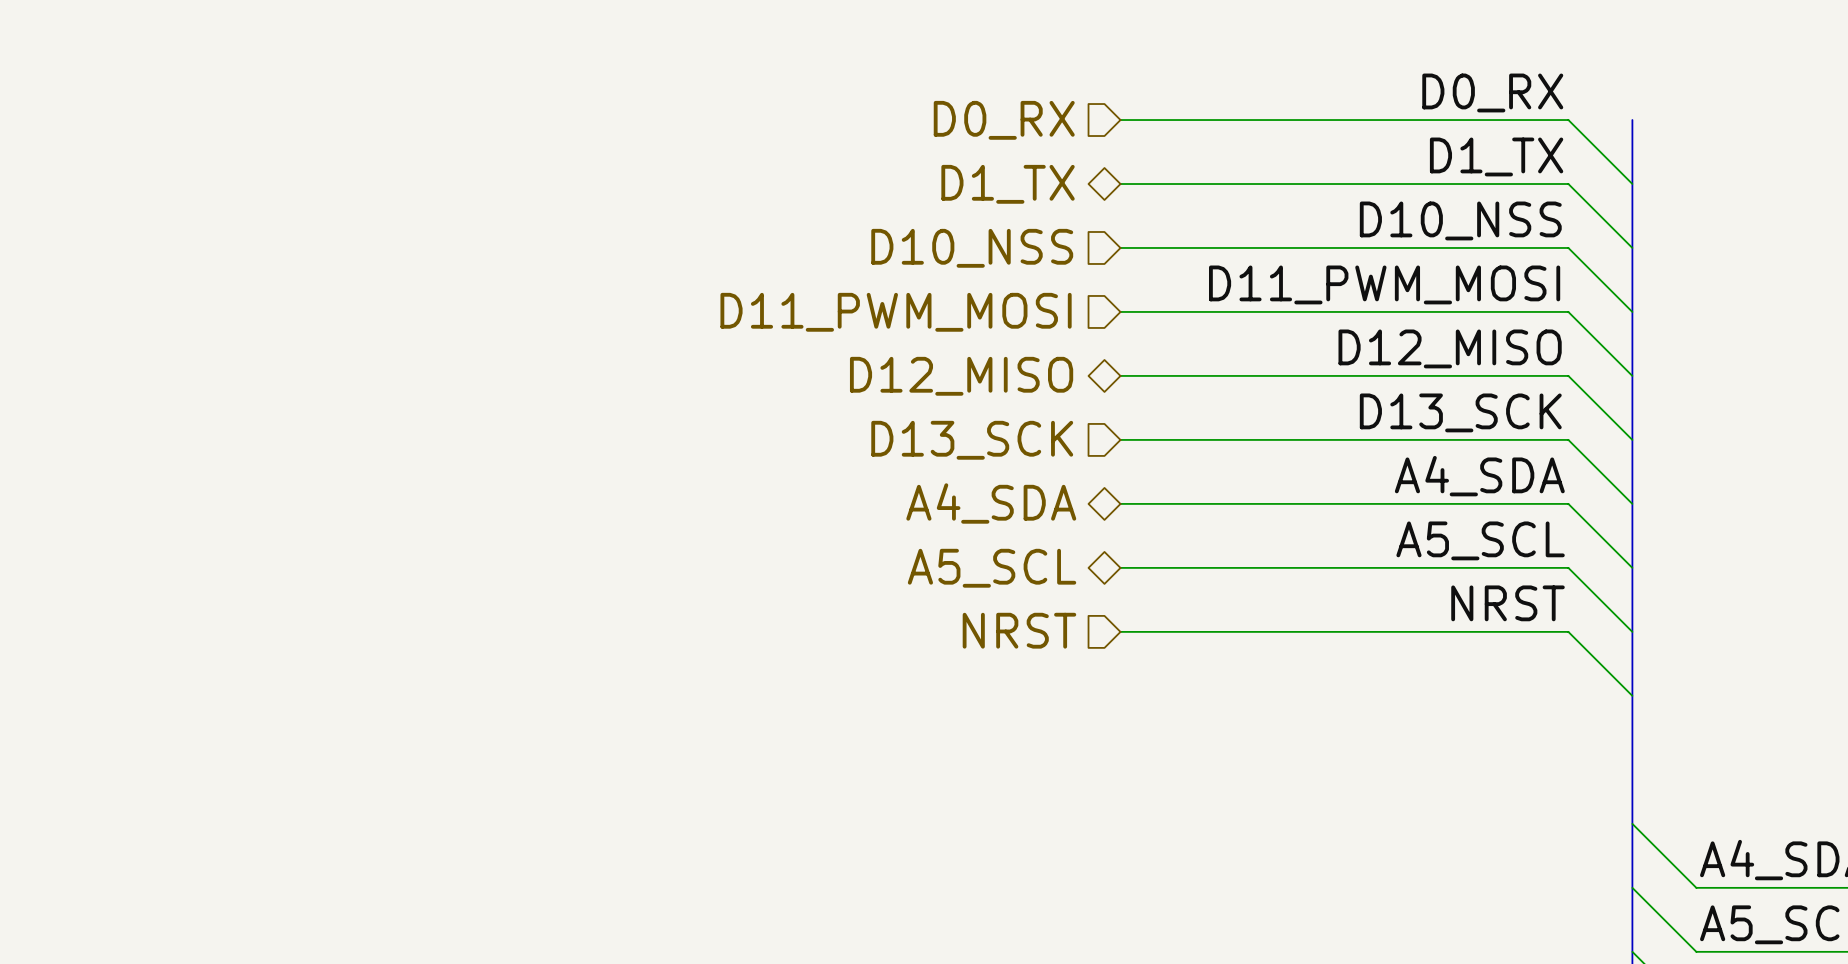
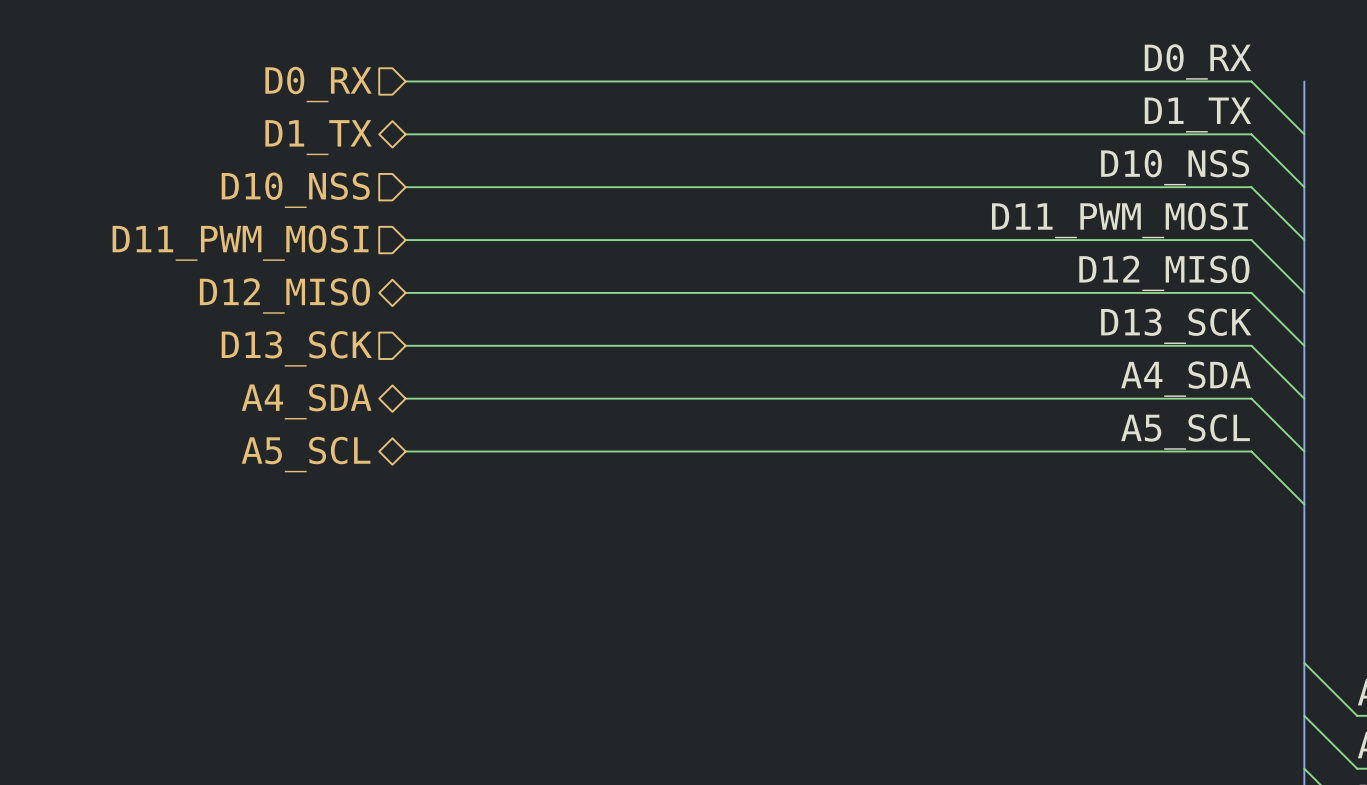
wire: none -> (405, 81) (881, 81)
hierarchical label position: D0_RX (1004, 120) -> D0_RX (318, 84)
wire: none -> (405, 134) (881, 134)
hierarchical label position: D1_TX (1008, 184) -> D1_TX (318, 137)
wire: none -> (405, 187) (881, 187)
hierarchical label position: D10_NSS (972, 248) -> D10_NSS (295, 190)
wire: none -> (405, 240) (881, 240)
hierarchical label position: D11_PWM_MOSI (896, 312) -> D11_PWM_MOSI (240, 243)
wire: none -> (405, 292) (881, 292)
hierarchical label position: D12_MISO (961, 376) -> D12_MISO (284, 295)
wire: none -> (405, 345) (881, 345)
hierarchical label position: D13_SCK (972, 440) -> D13_SCK (296, 348)
wire: none -> (405, 398) (881, 398)
hierarchical label position: A4_SDA (991, 503) -> A4_SDA (306, 401)
wire: none -> (405, 451) (881, 451)
hierarchical label position: A5_SCL (992, 568) -> A5_SCL (306, 454)
label: NRST (1508, 603) -> none
hierarchical label: NRST (1019, 630) -> none
wire: (1120, 631) (1568, 631) (1632, 695) -> none

